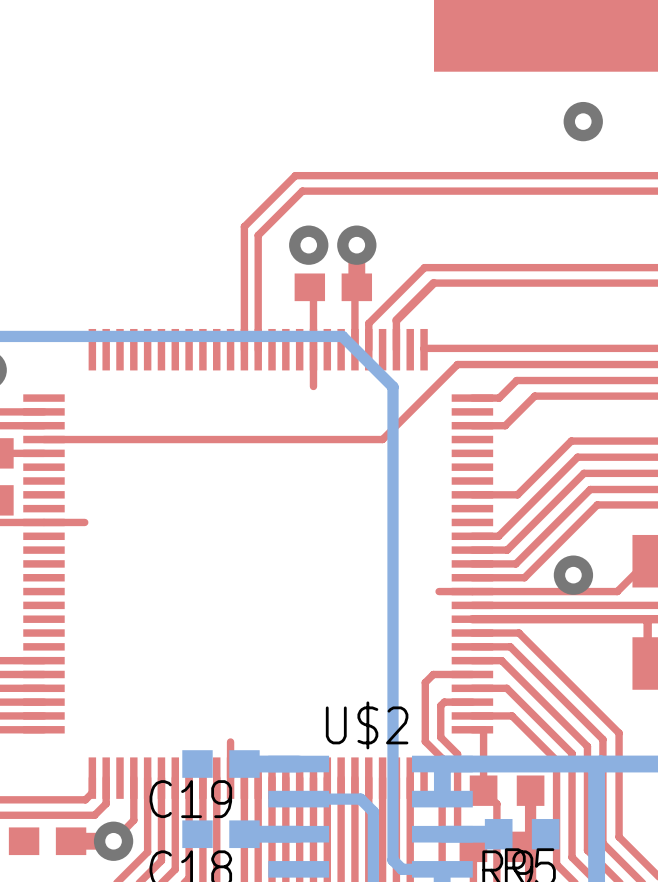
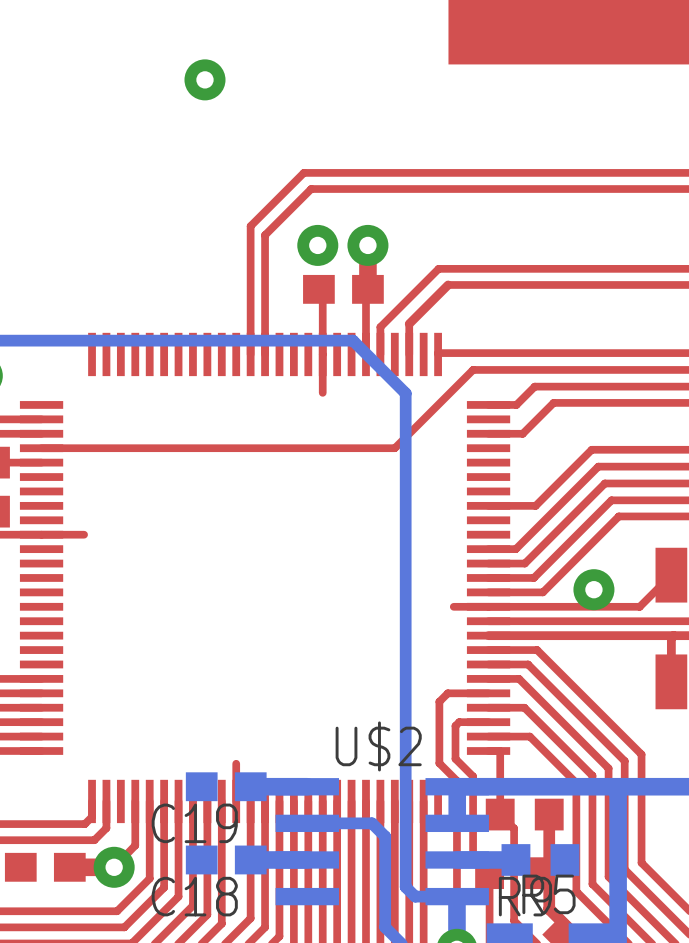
via: none -> (204, 79)
via: (583, 121) -> none

